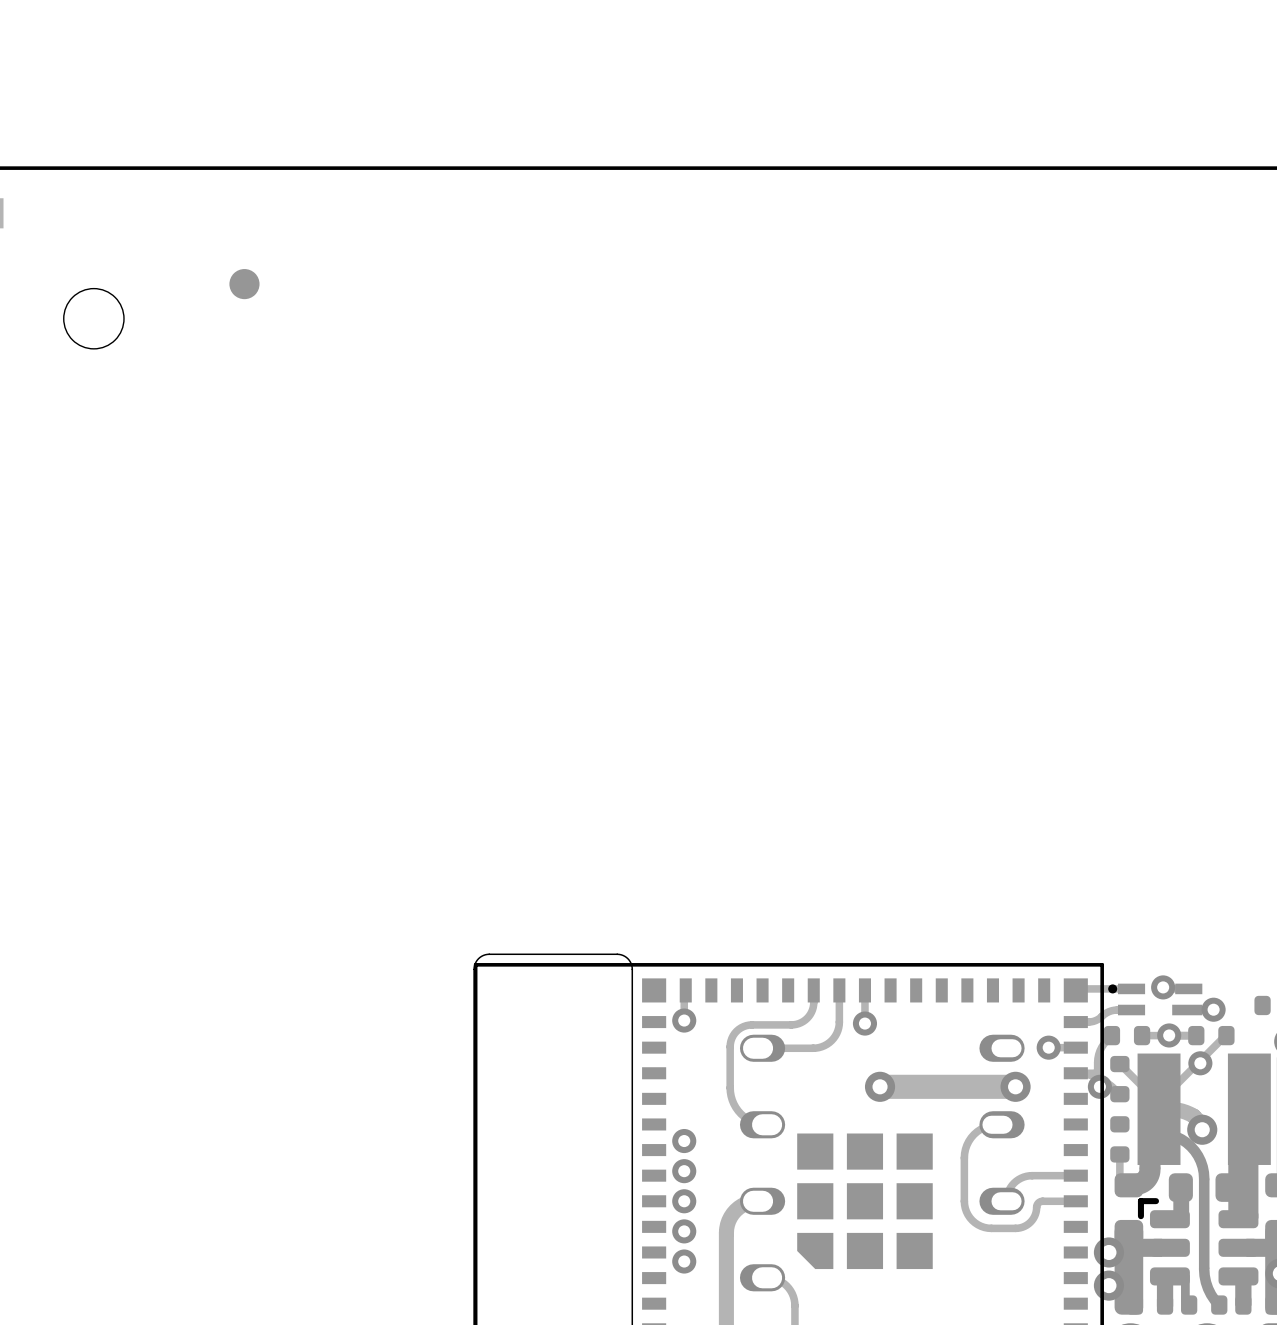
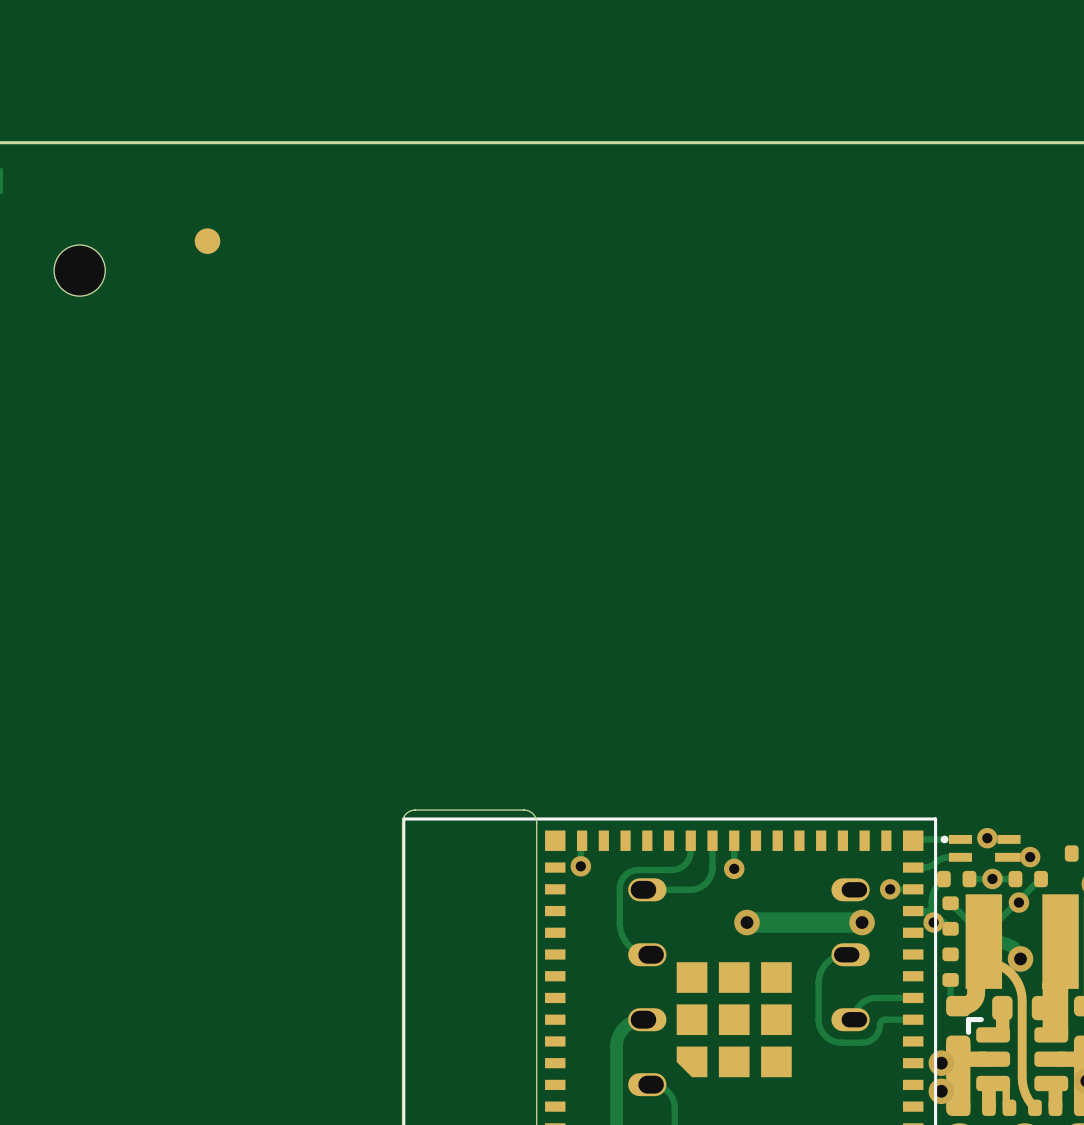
via: (684, 1141) -> none
via: (684, 1171) -> none
via: (684, 1201) -> none
via: (684, 1231) -> none
via: (684, 1261) -> none

